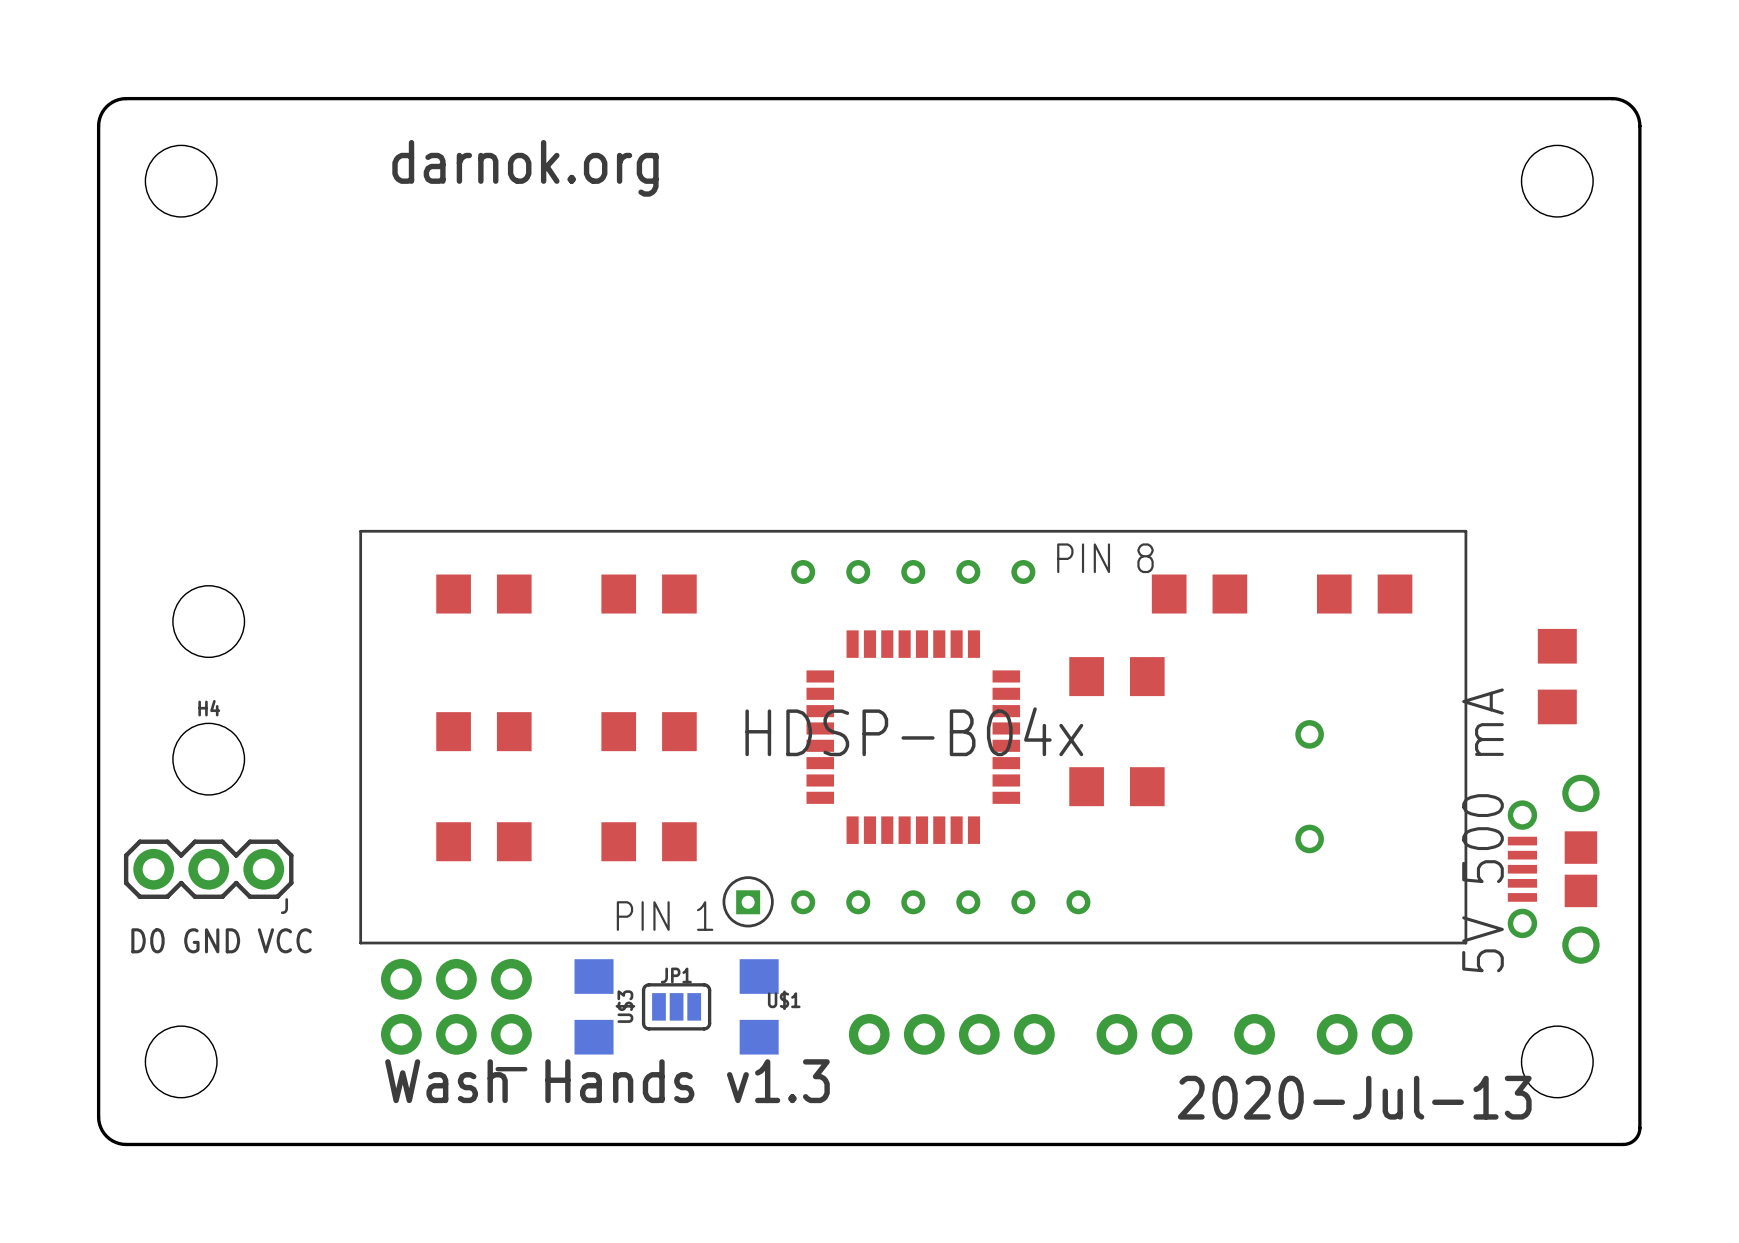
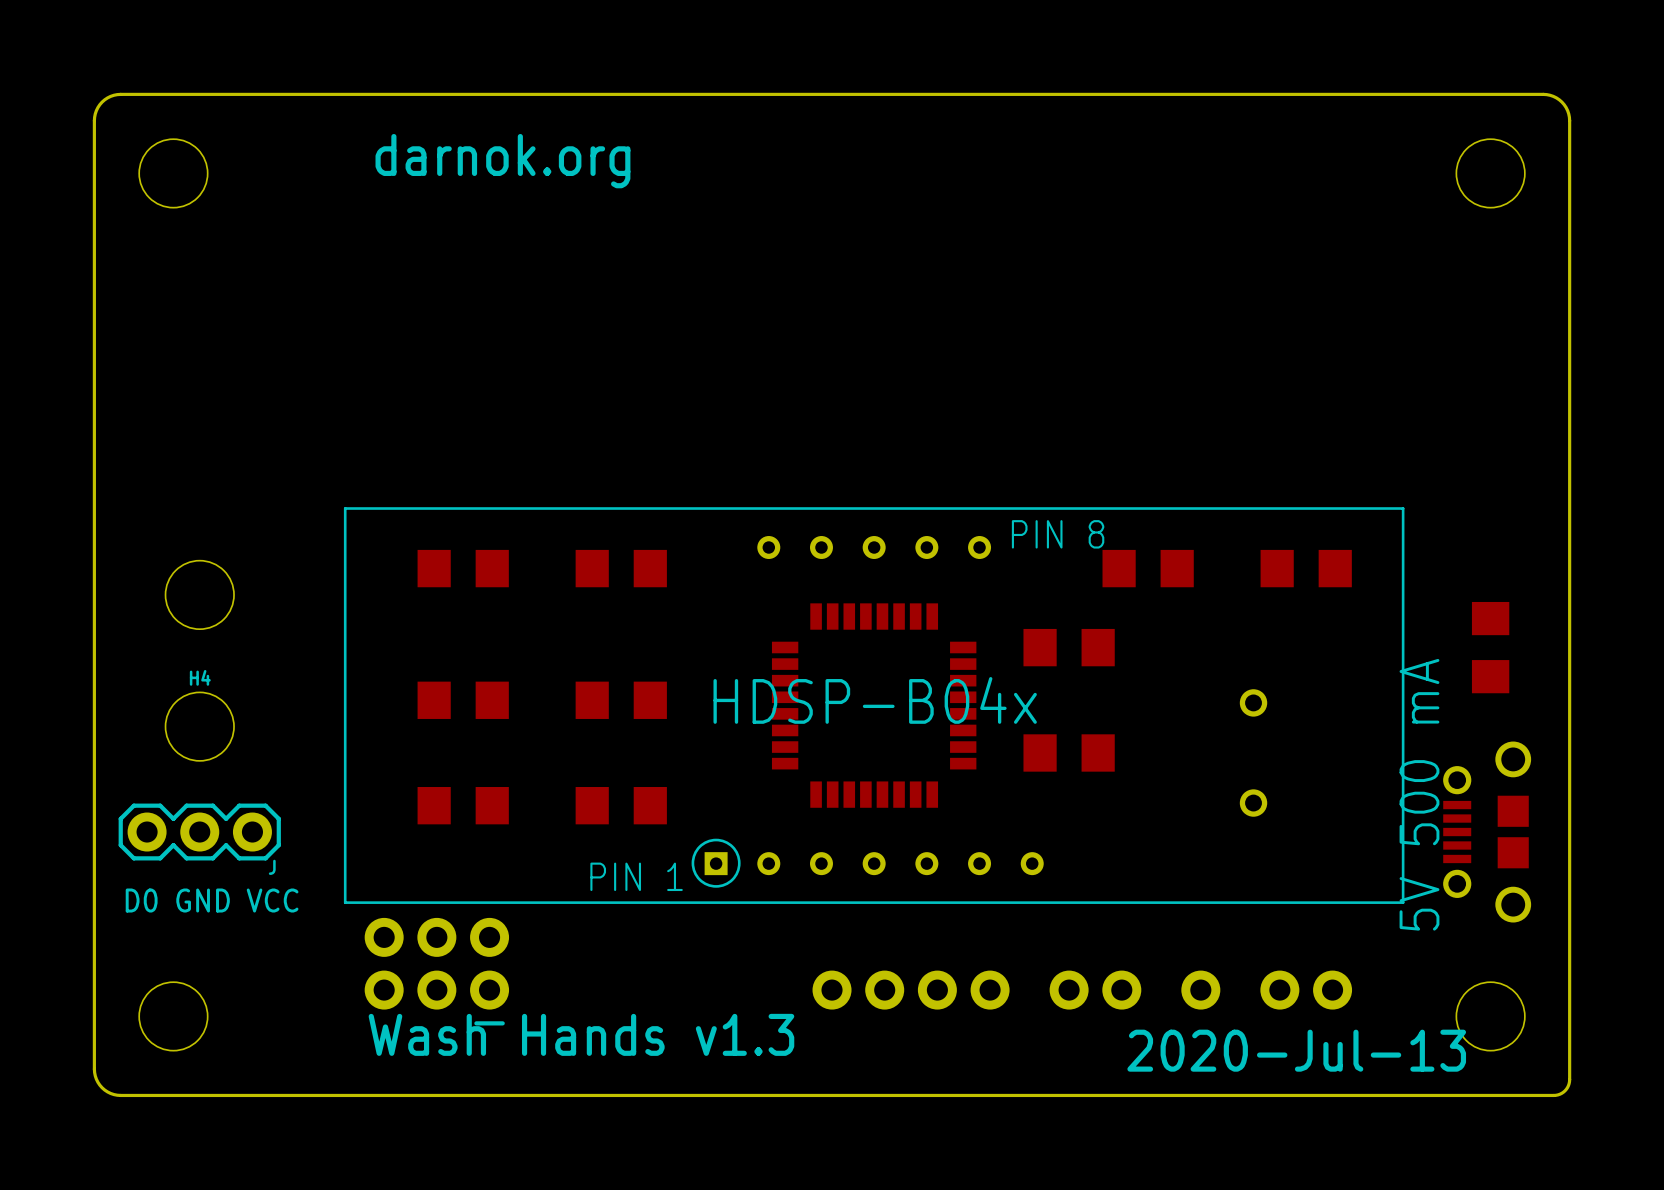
U$3: (594, 1006) -> none
JP1: (676, 1006) -> none
U$1: (759, 1006) -> none

